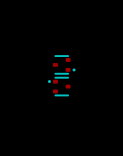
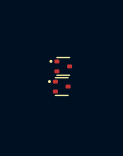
part rotation: 0° (64, 64) -> 180° (60, 66)

